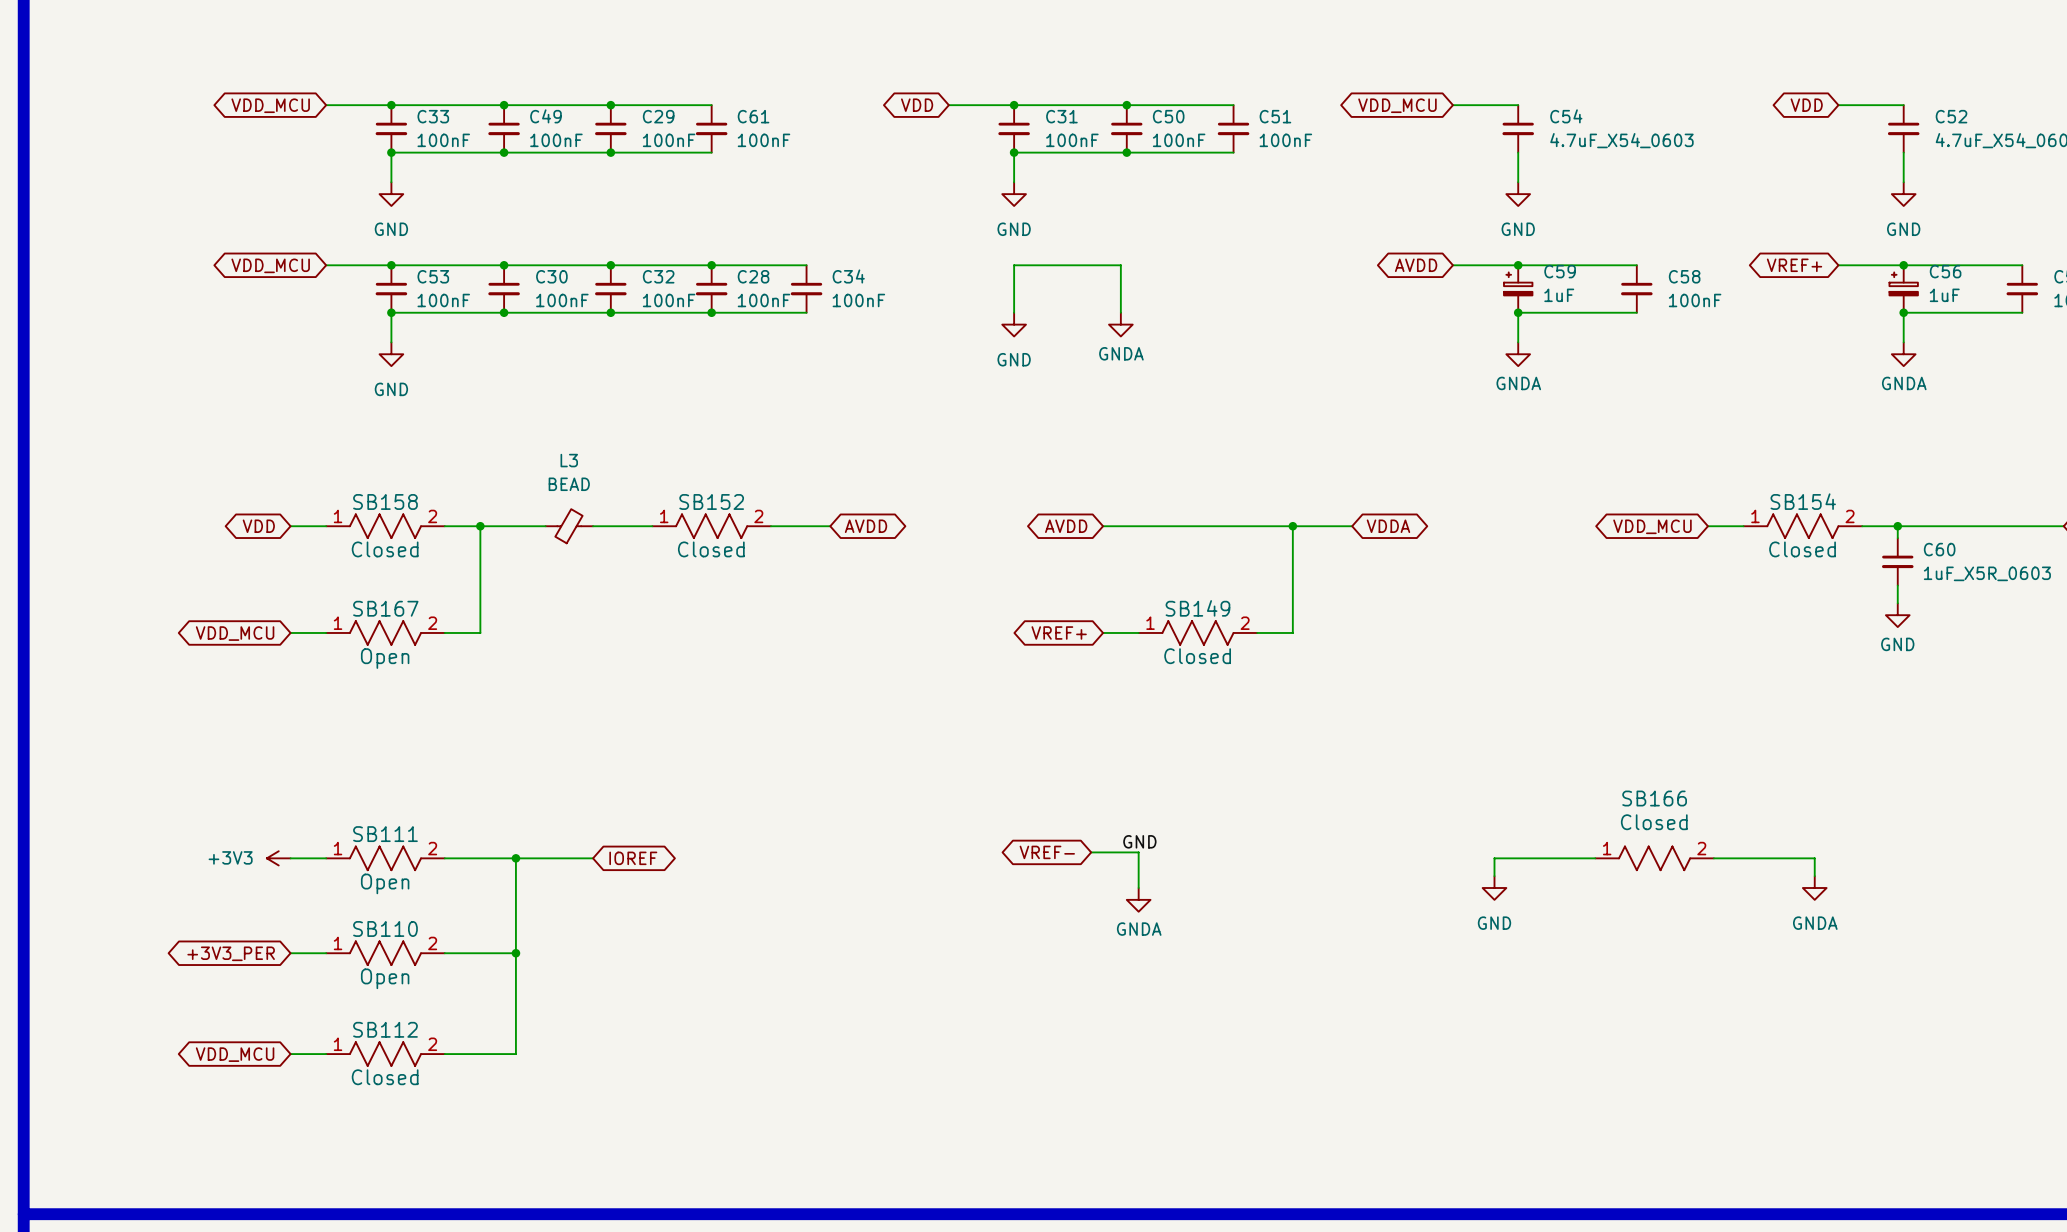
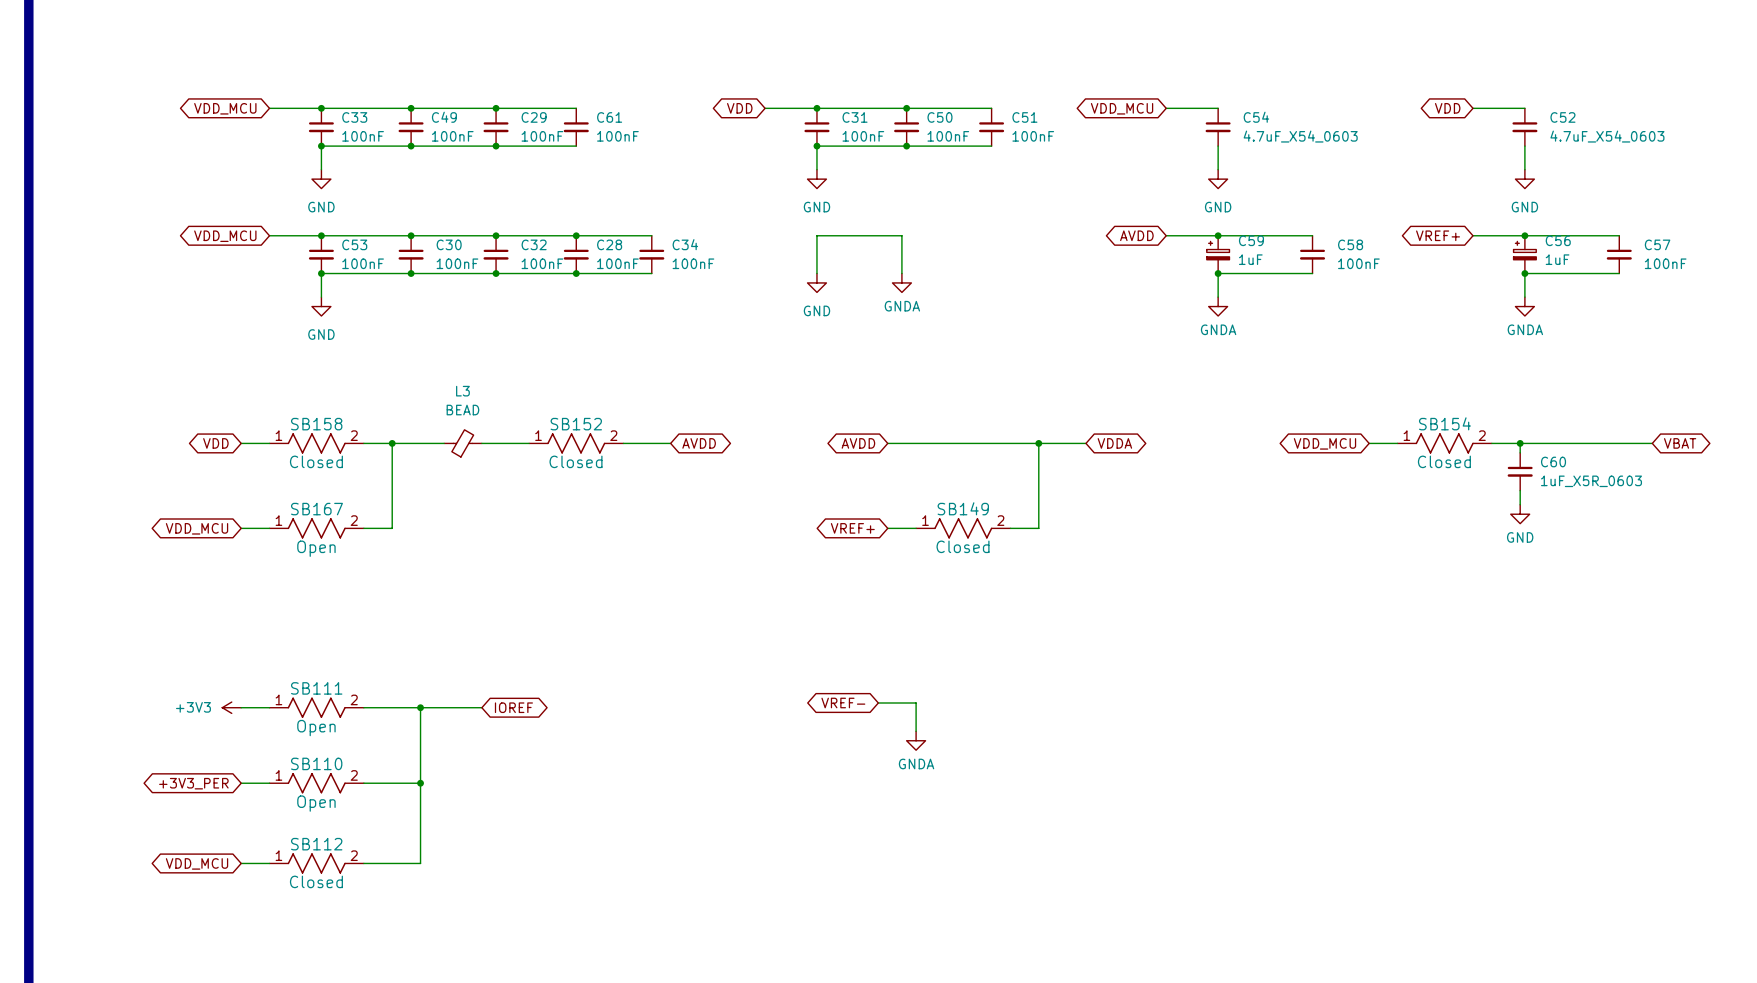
label: GND (1139, 841) -> none
wire: (1595, 858) (1494, 858) (1494, 876) -> none
SB166: Closed (1654, 858) -> none
wire: (1713, 858) (1814, 858) (1814, 876) -> none
power symbol: GND (1494, 888) -> none
power symbol: GNDA (1814, 888) -> none

